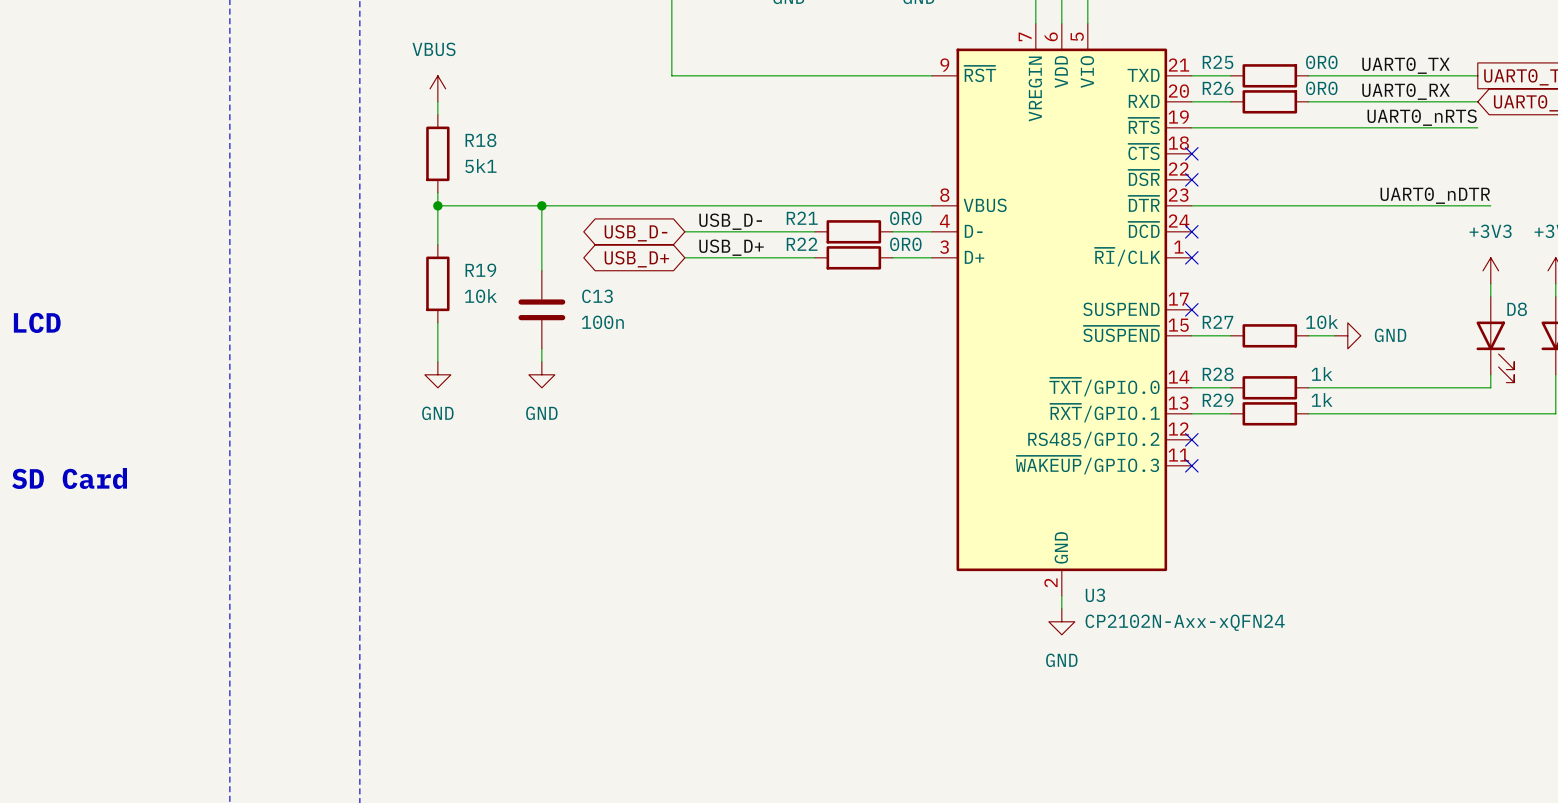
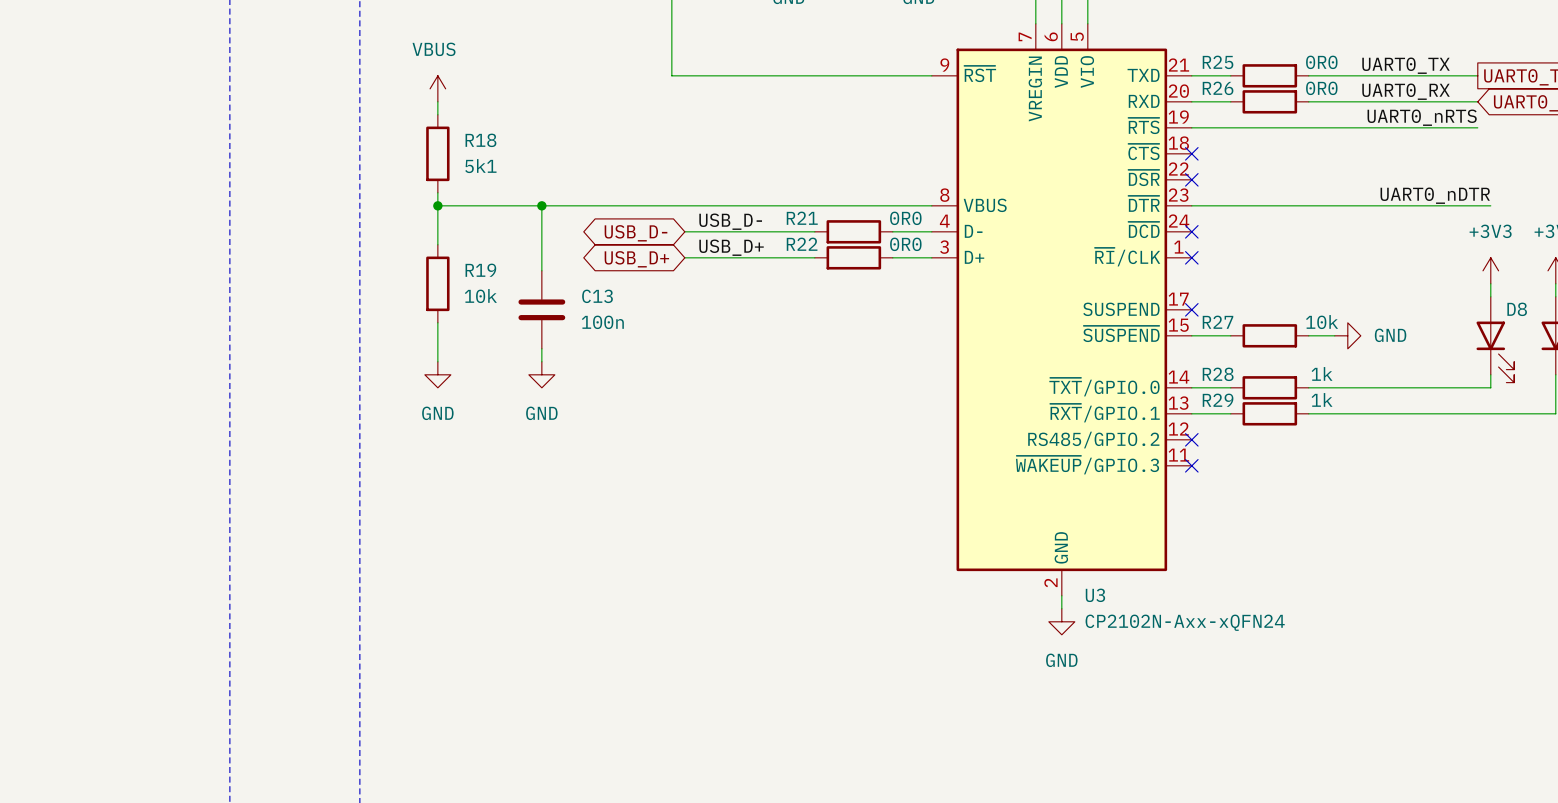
text: LCD (37, 322) -> none
text: SD Card (69, 478) -> none

